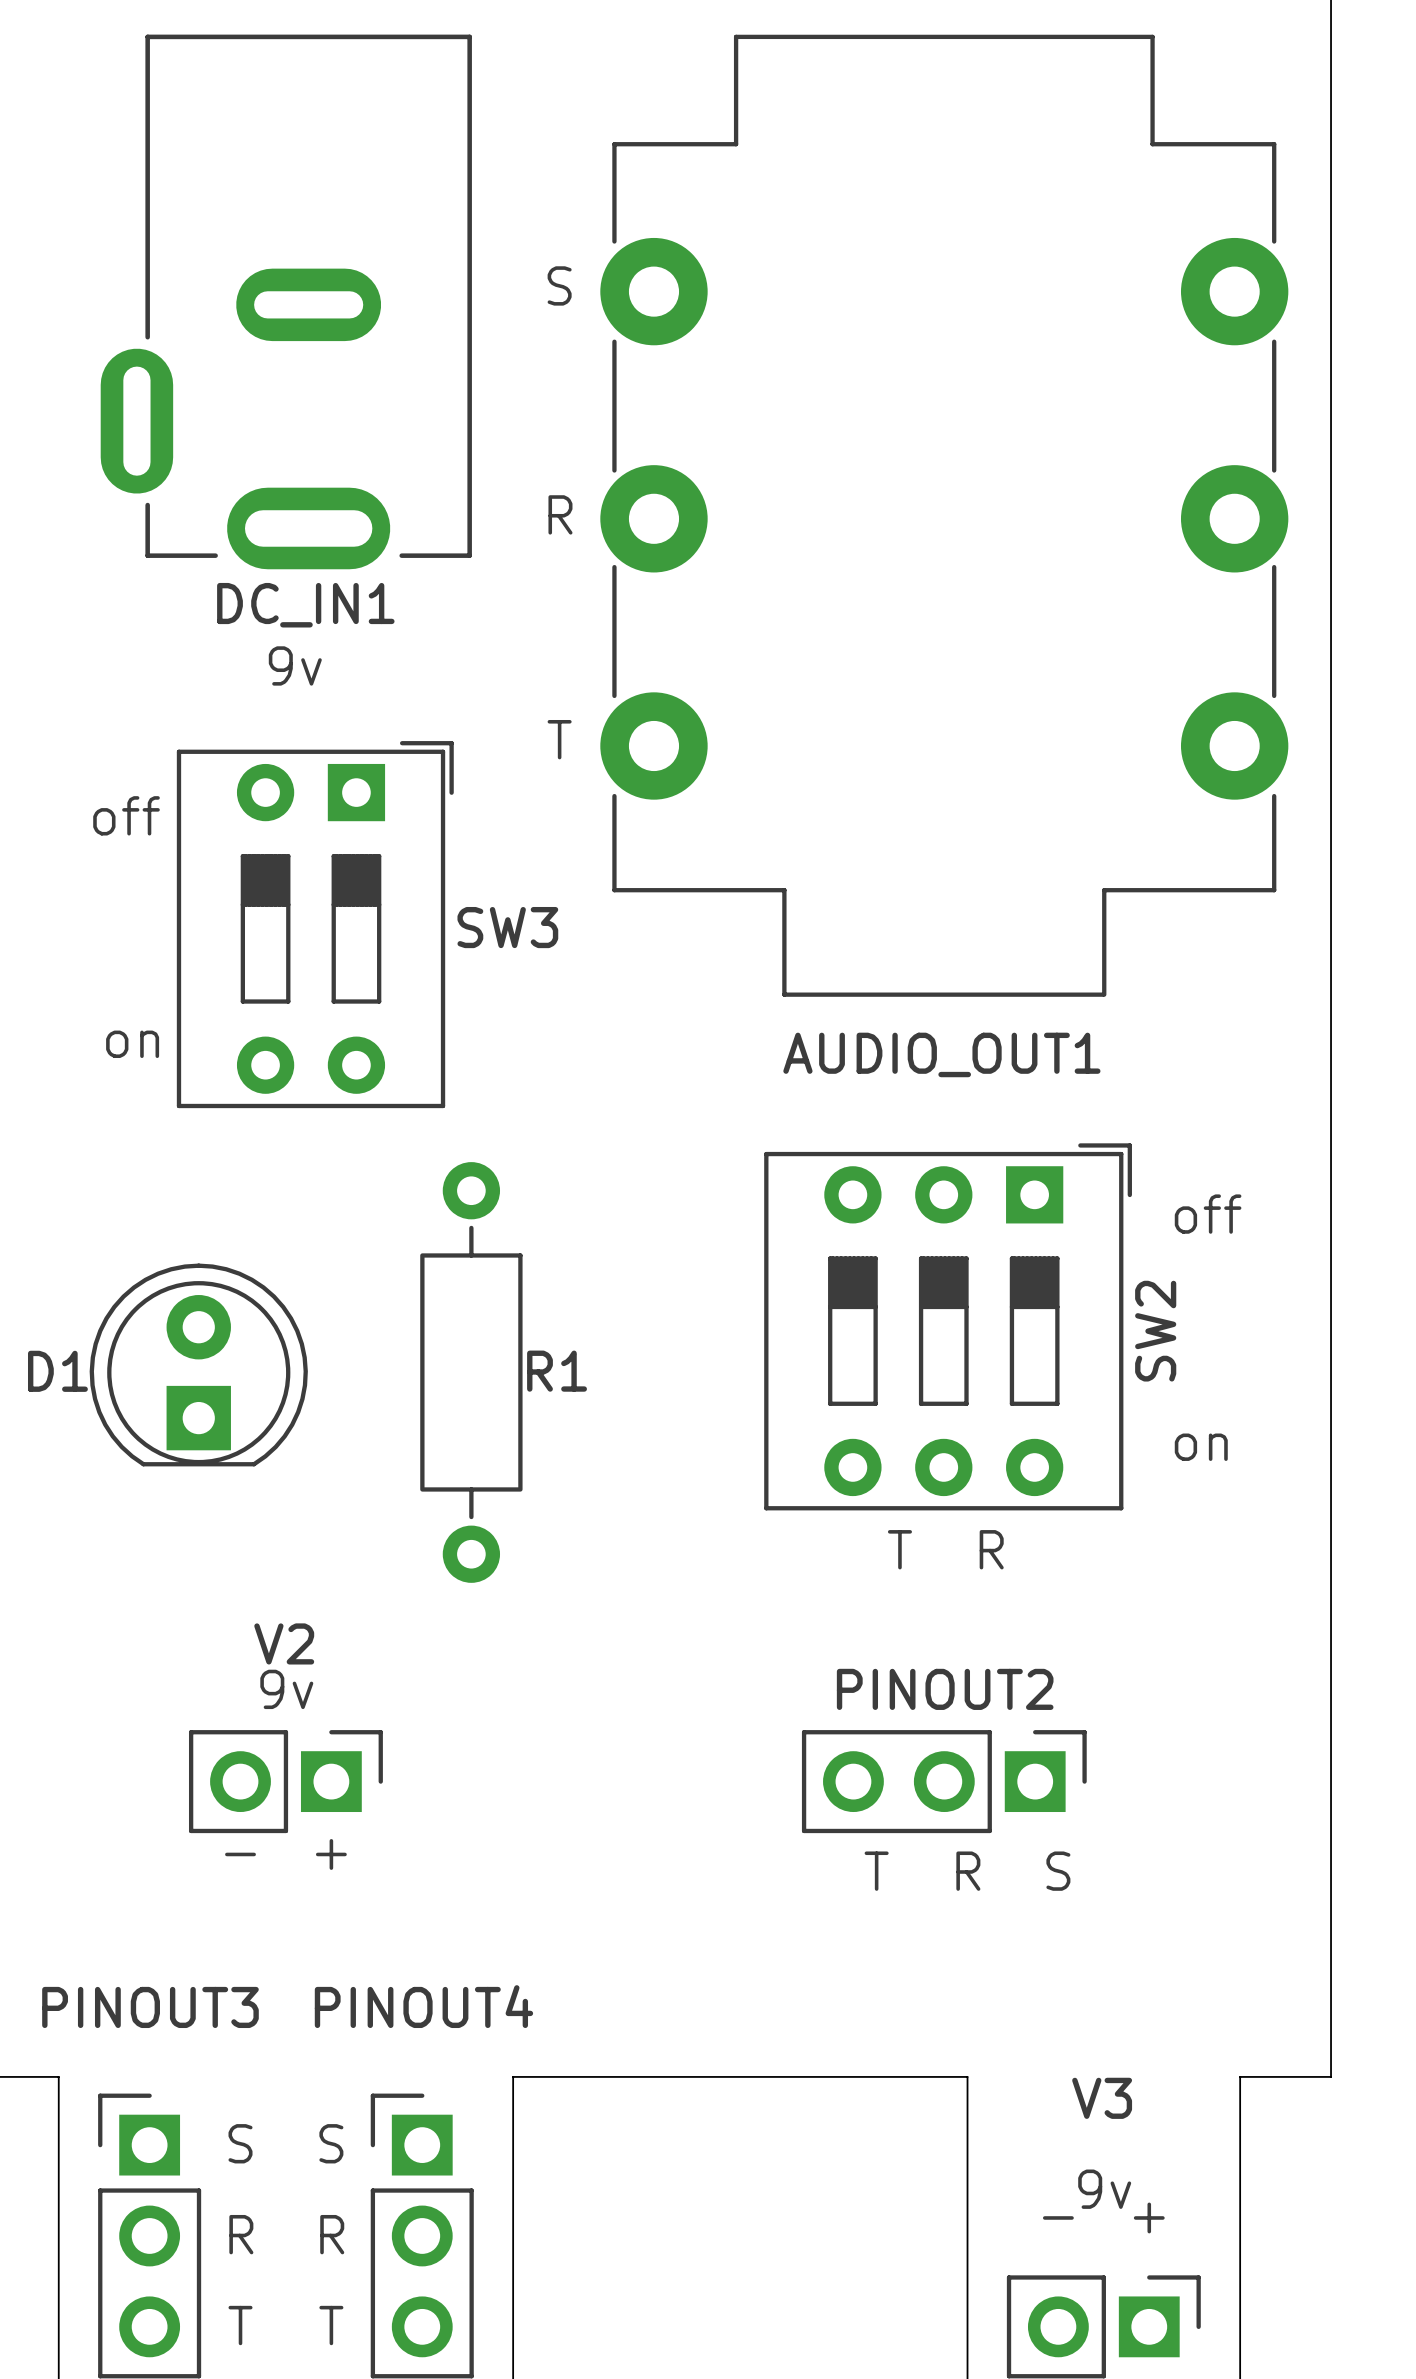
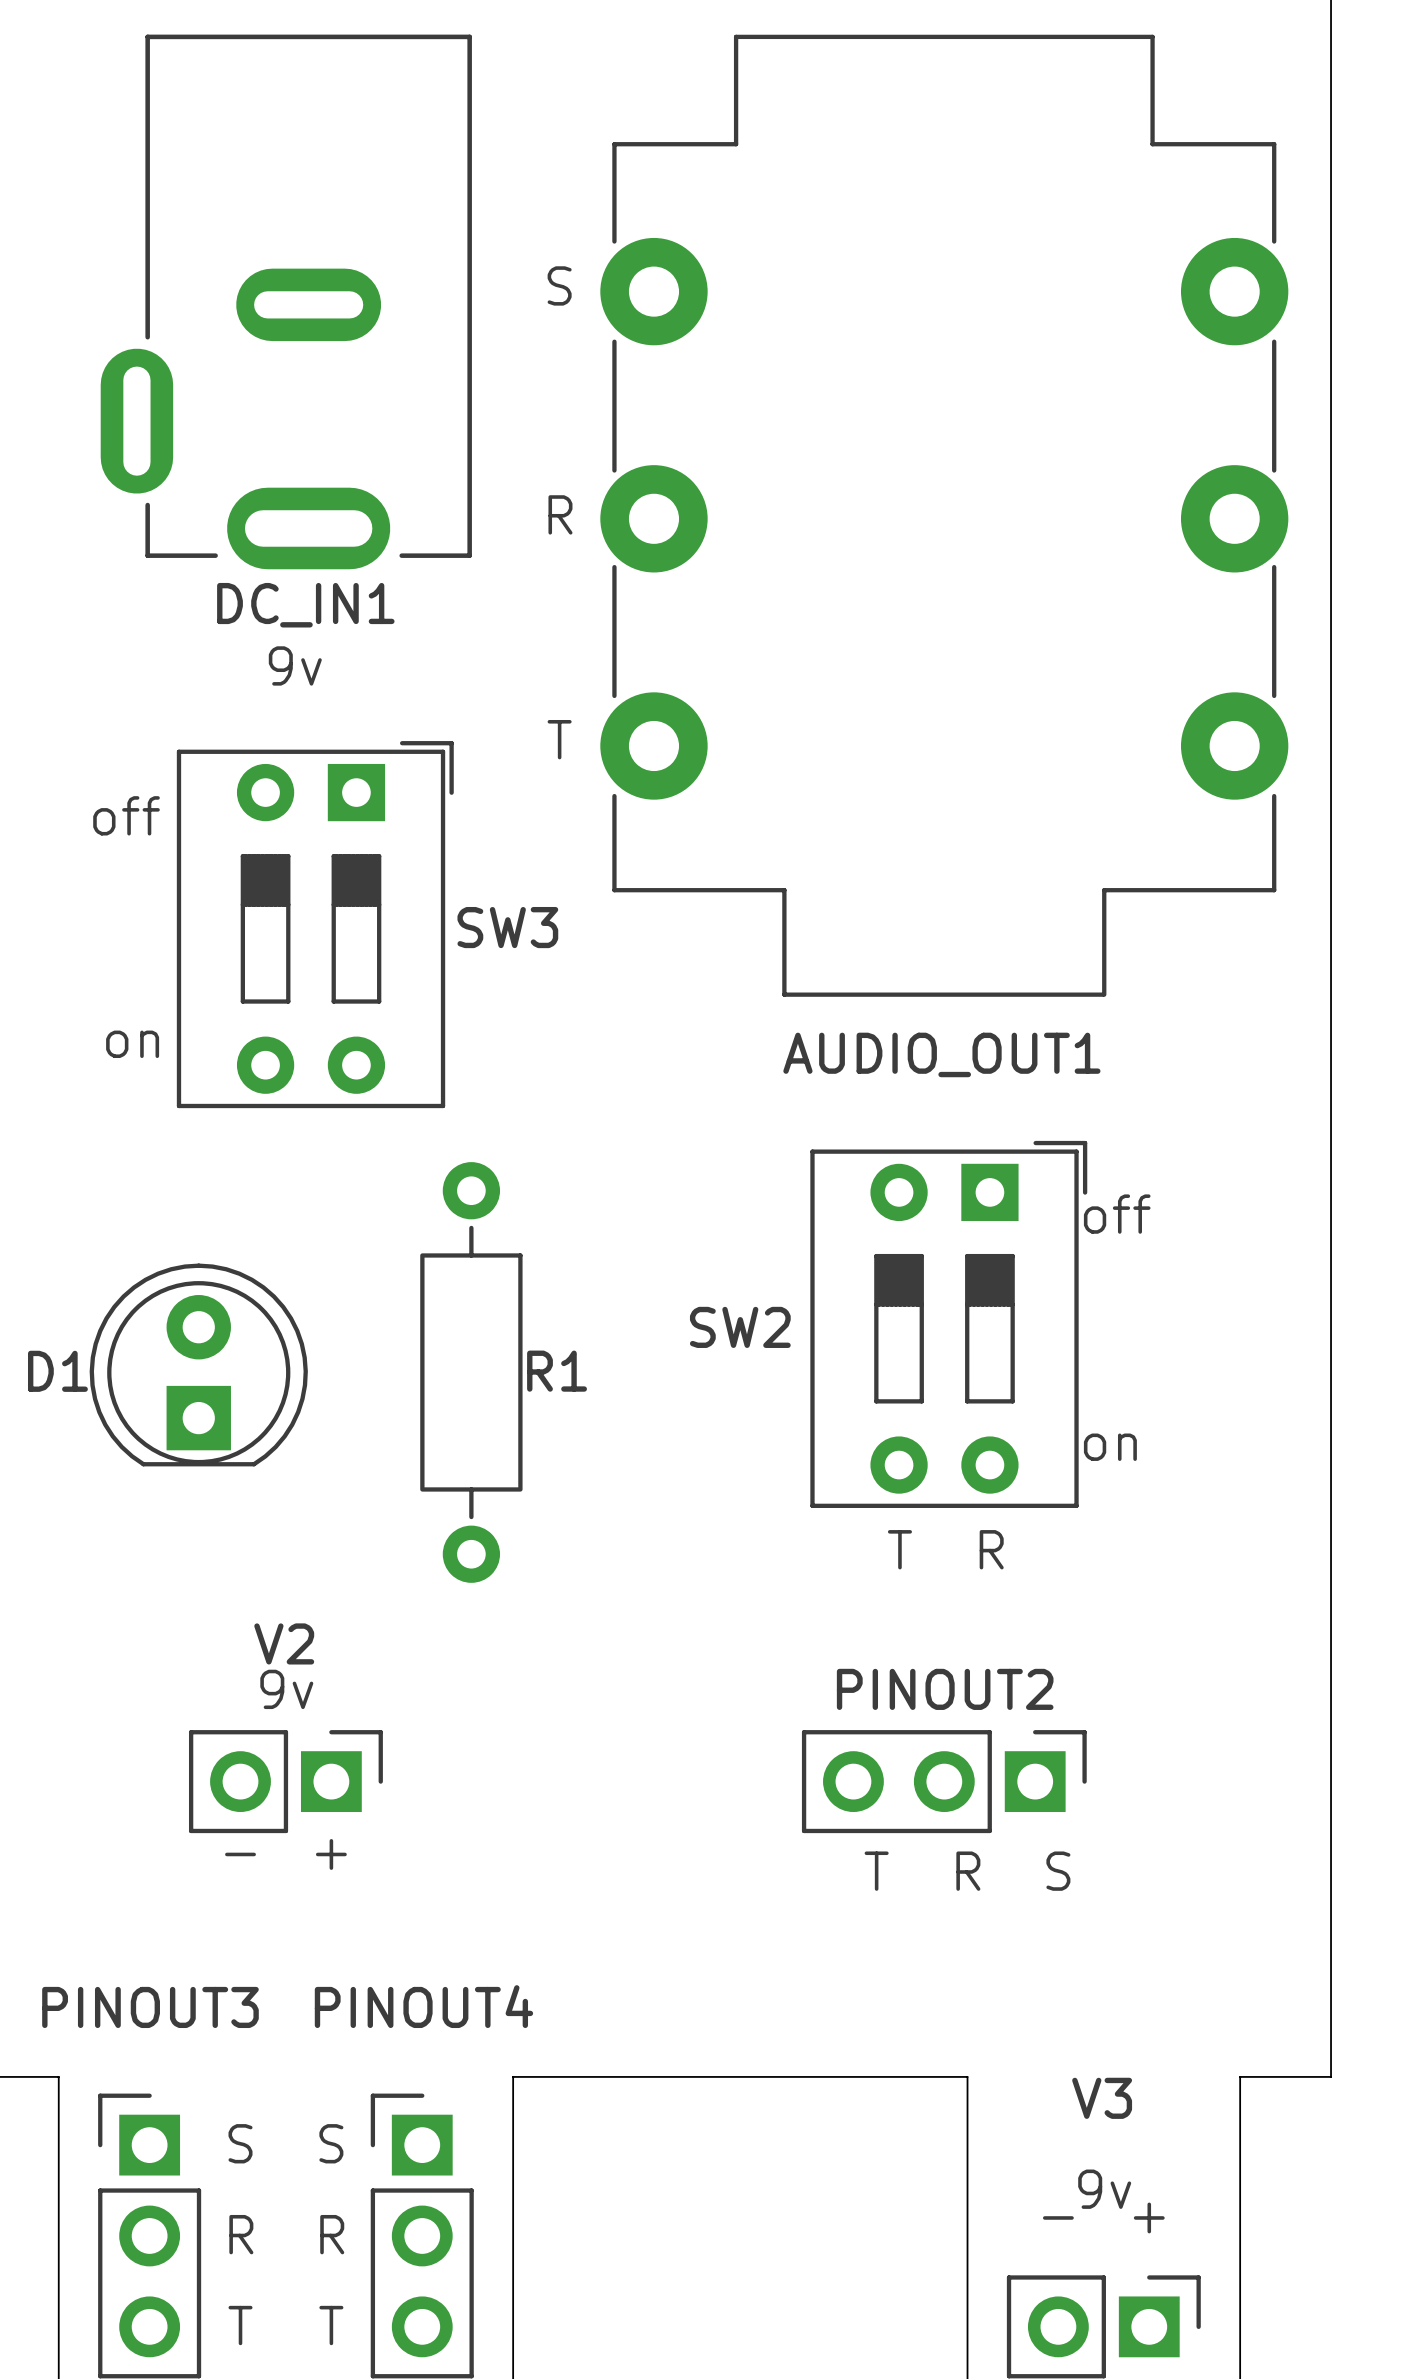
SW2 footprint: [764, 1143, 1132, 1511] -> [810, 1140, 1088, 1508]
text position: off (1208, 1214) -> off (1117, 1214)
SW2 name position: SW2 (1155, 1331) -> SW2 (740, 1327)
text position: on (1201, 1447) -> on (1110, 1447)

